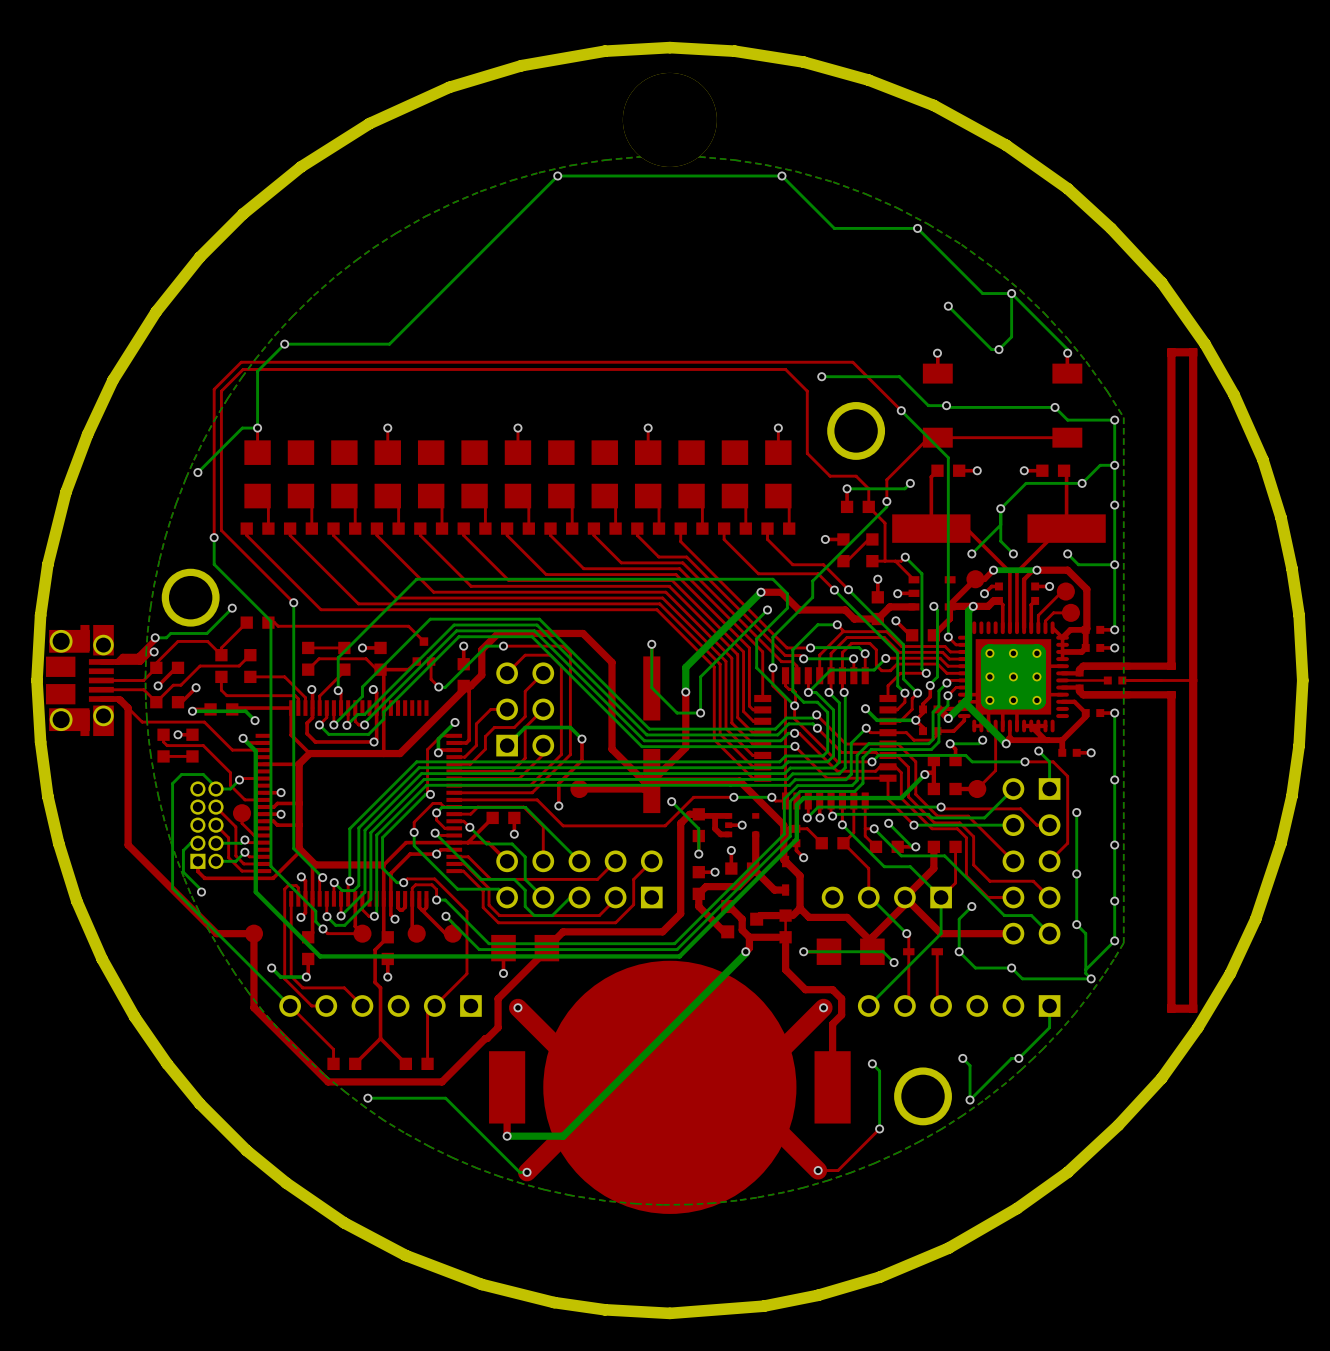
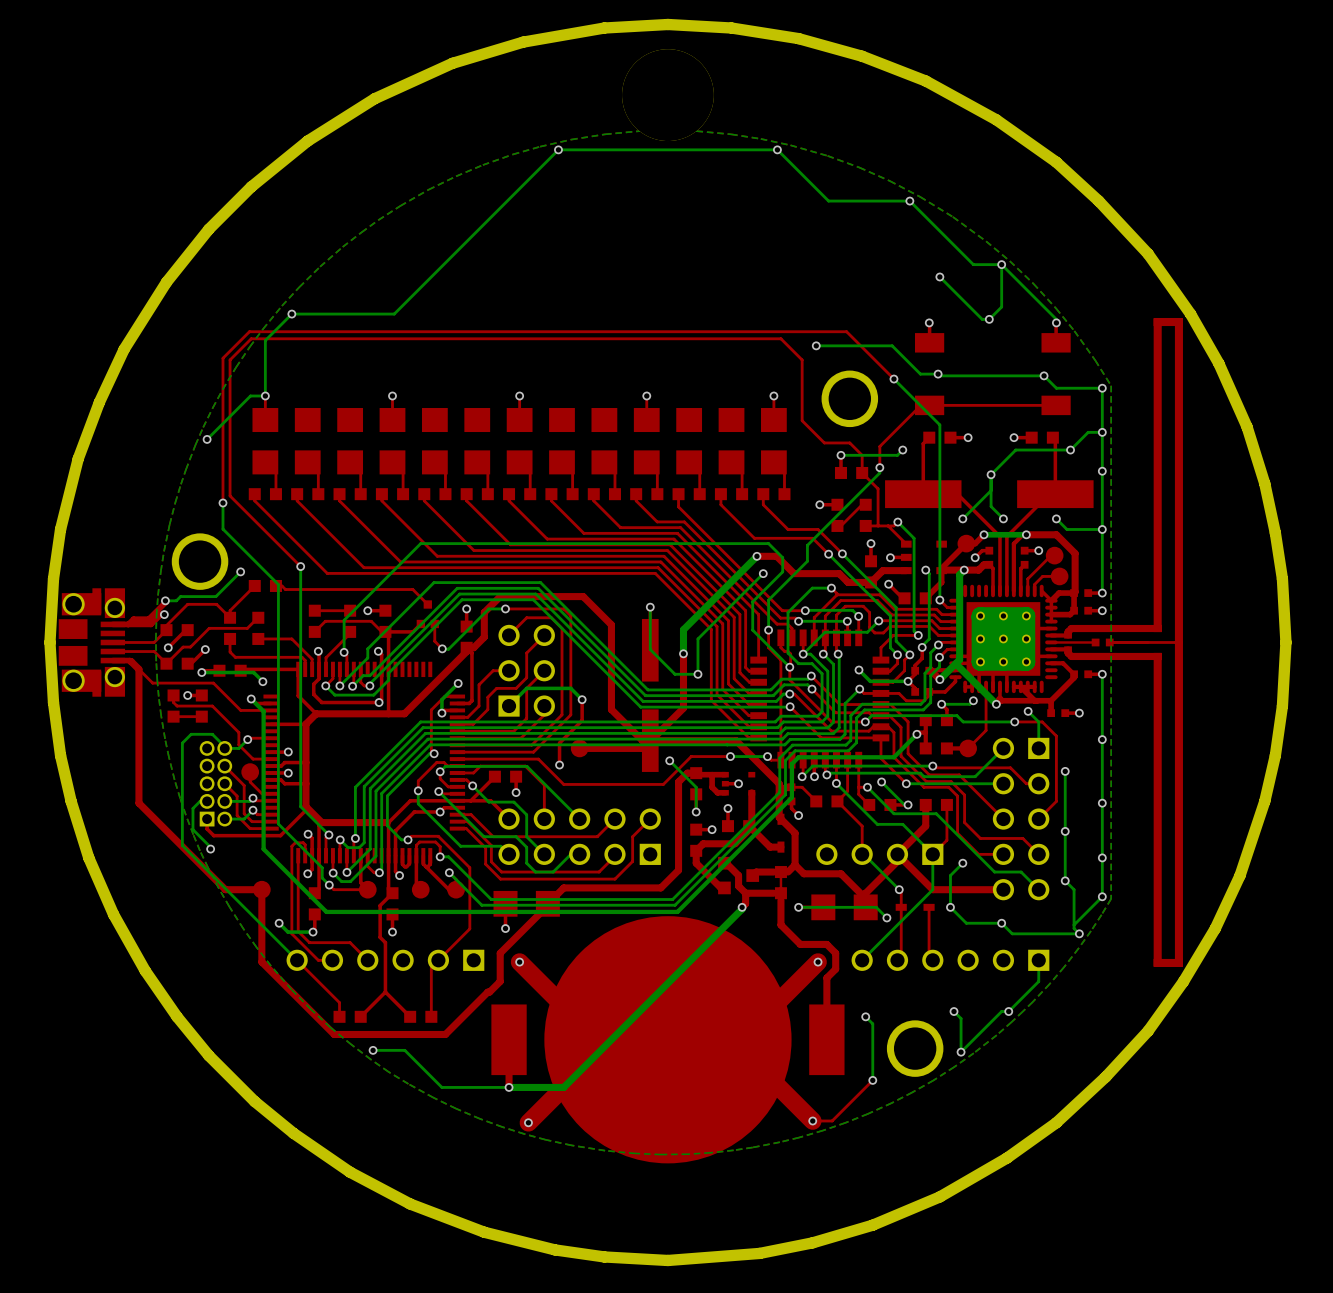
bottom track: (400, 1098) (445, 1098) (519, 1172) (527, 1172) -> (404, 1050) (441, 1087) (509, 1087)

